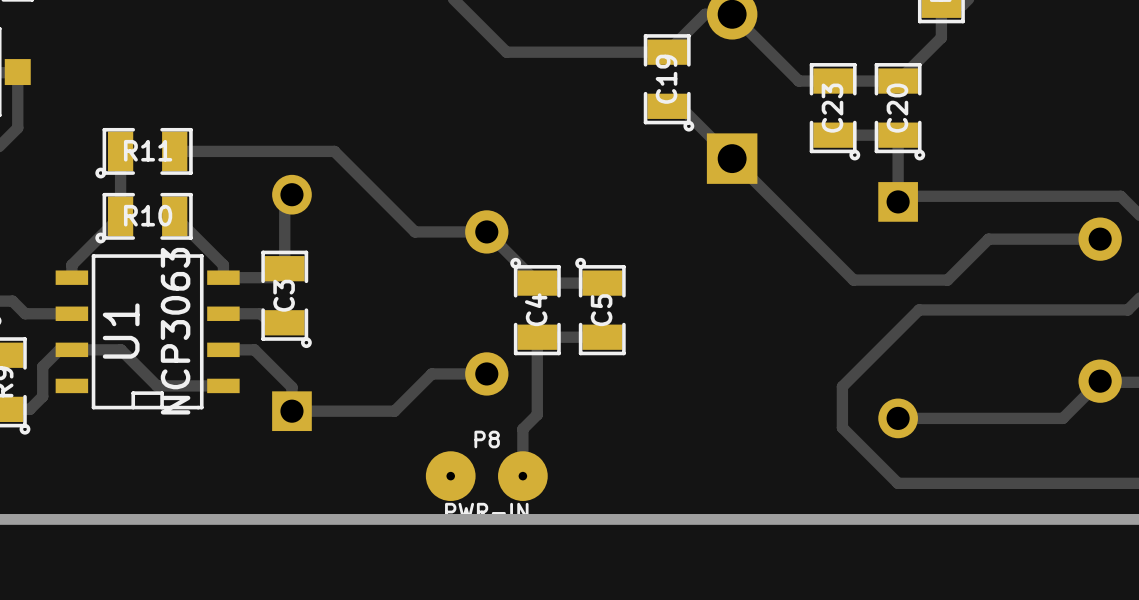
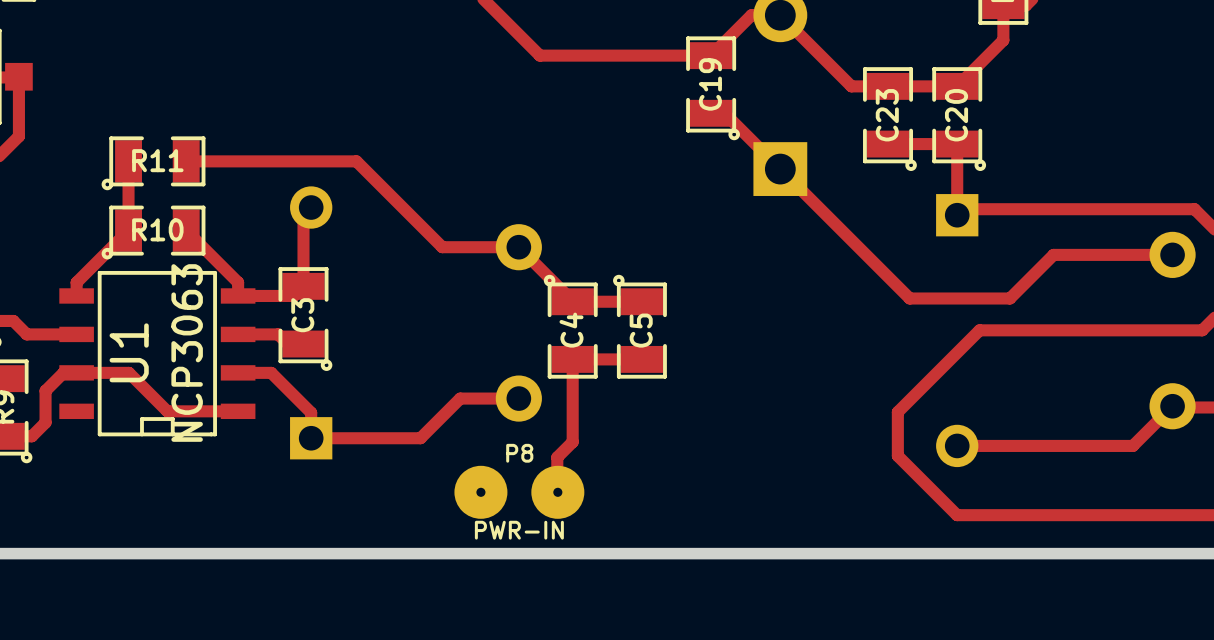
P8 position: (486, 476) -> (519, 492)

